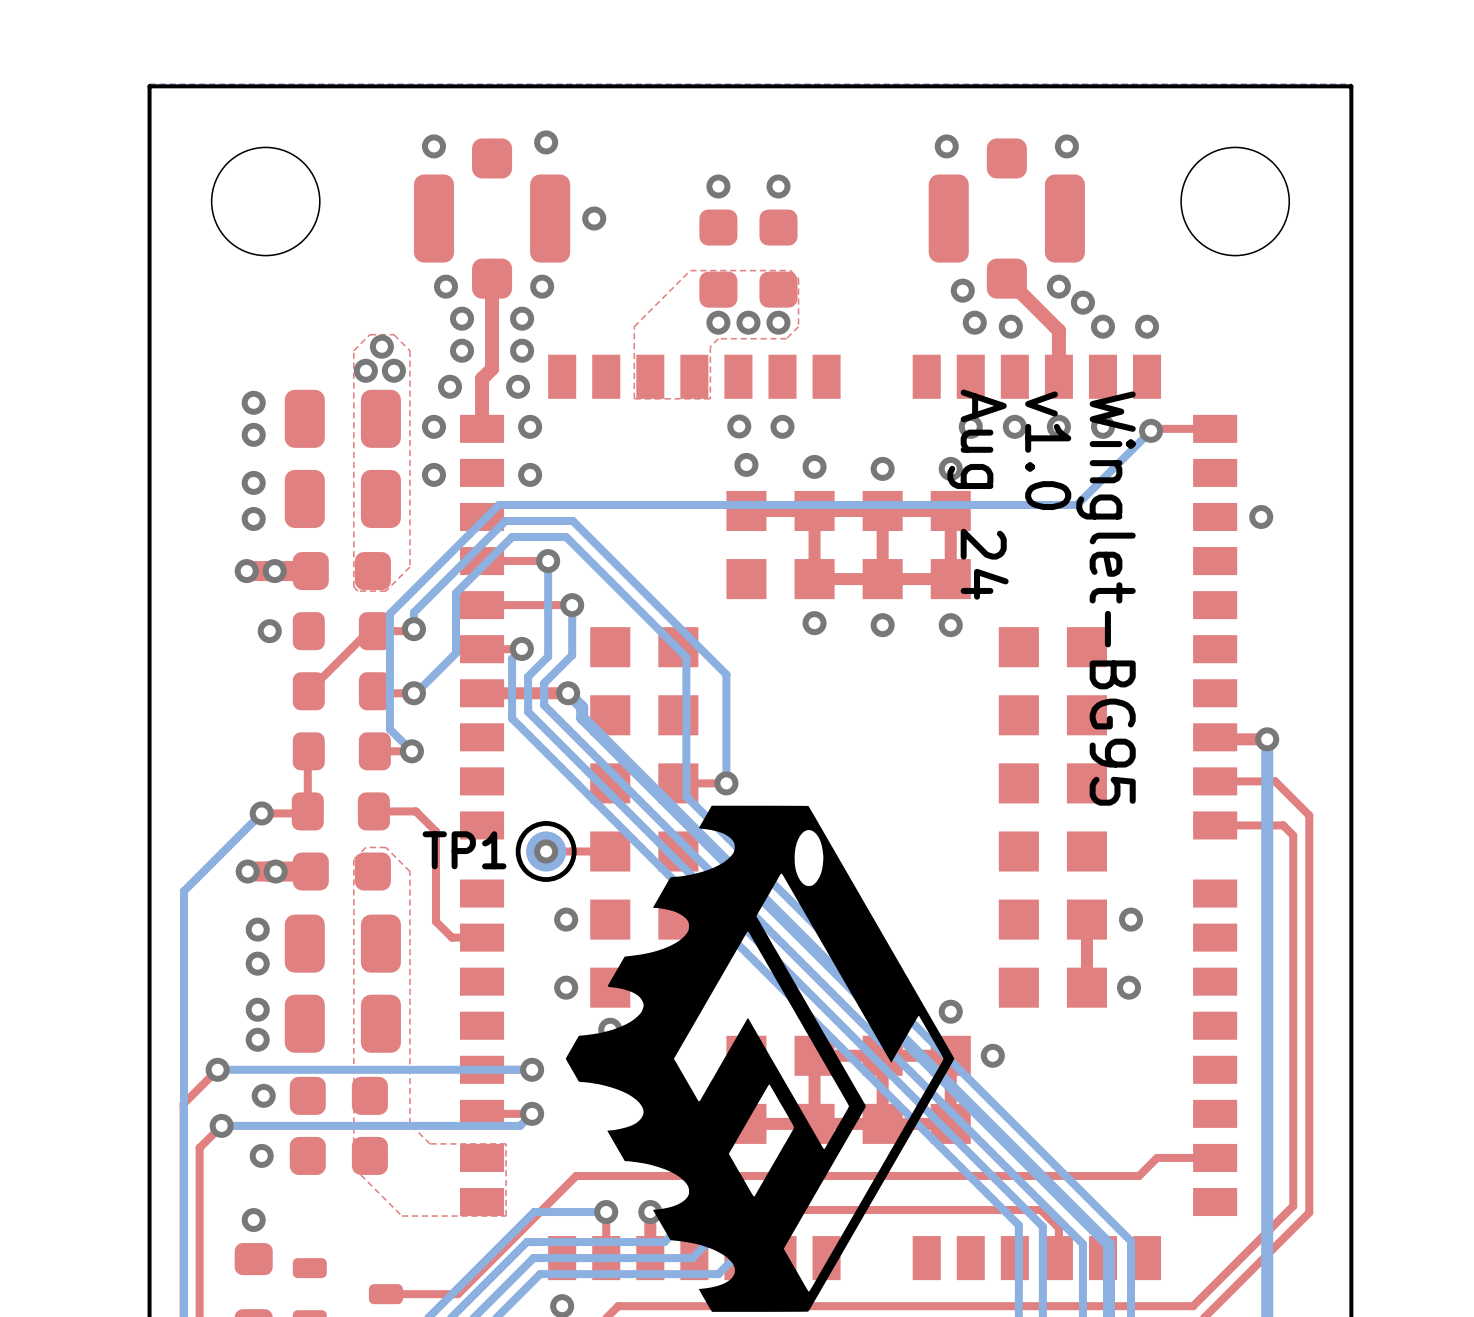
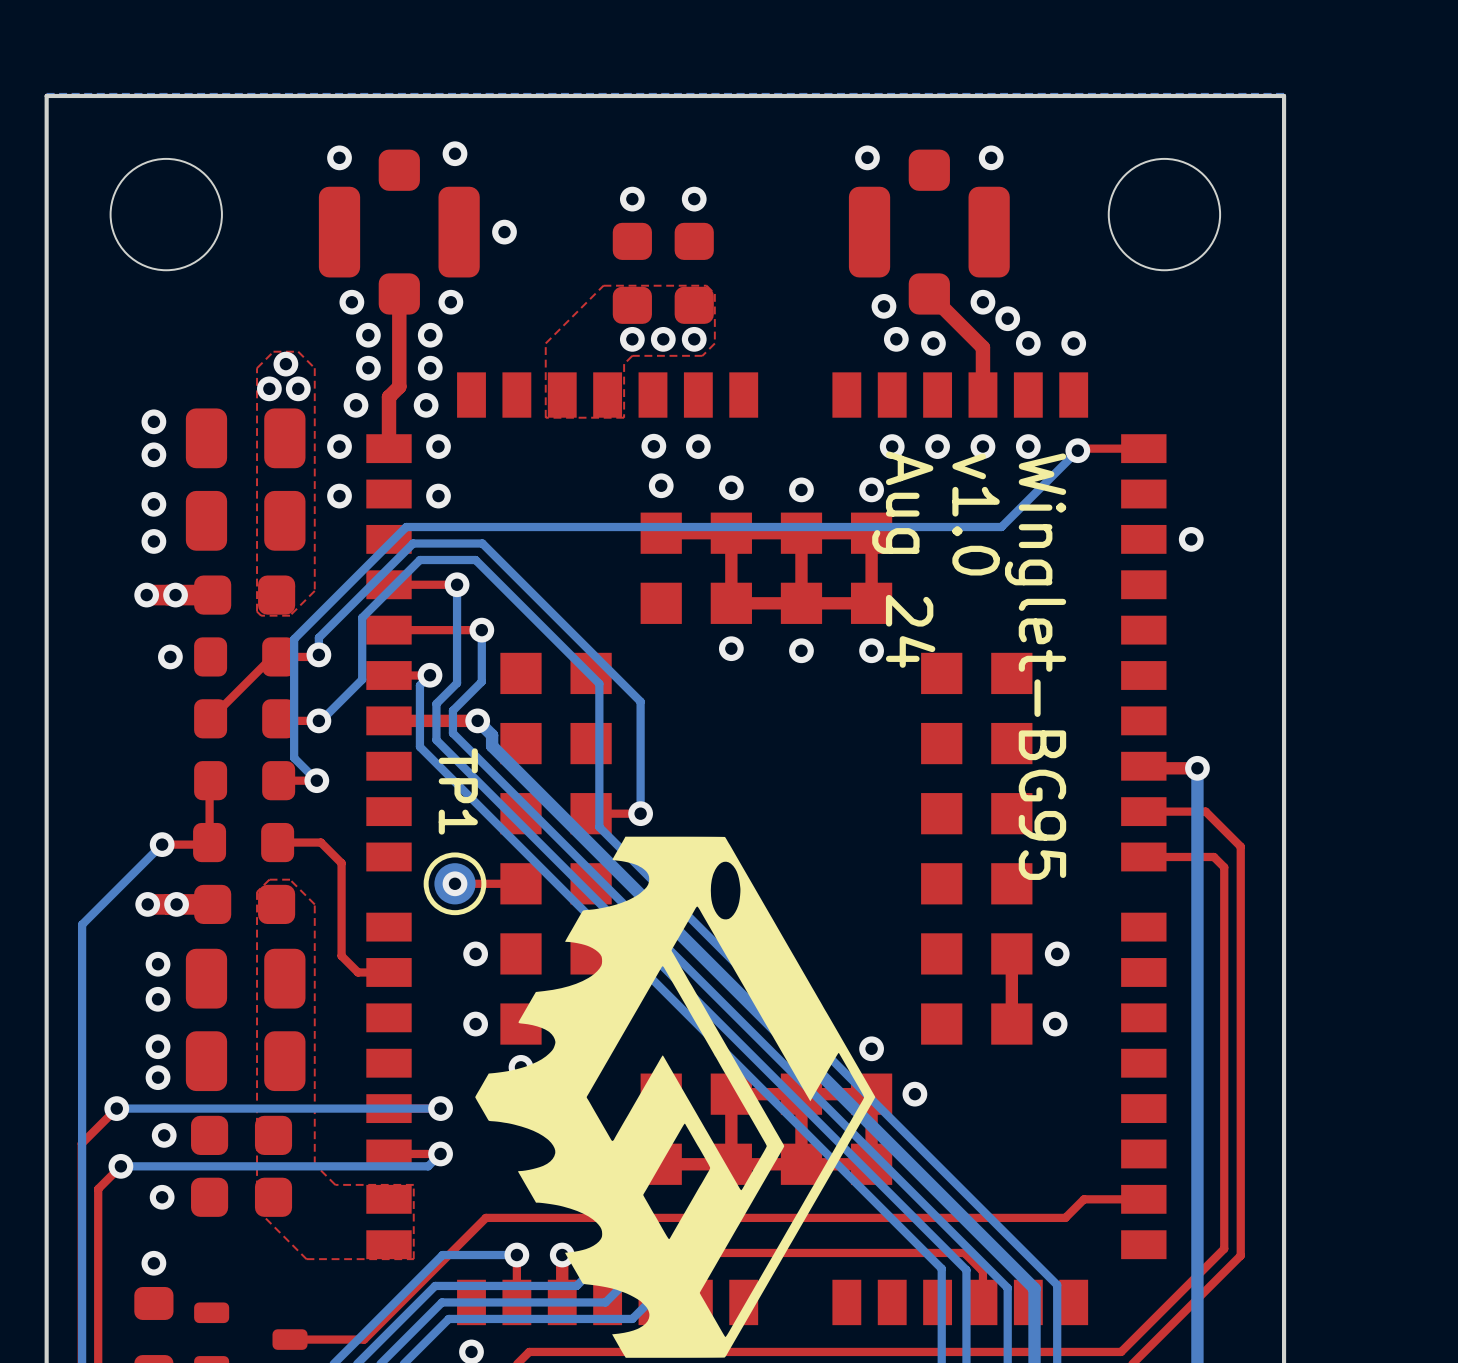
text position: v1.0 (1048, 450) -> v1.0 (976, 514)
text position: Aug 24 (977, 494) -> Aug 24 (903, 559)
text position: Winglet-BG95 (1106, 598) -> Winglet-BG95 (1035, 666)
TP1 name rotation: 0° (464, 850) -> 90° clockwise (458, 791)
TP1 name position: TP1 (464, 850) -> TP1 (458, 791)

